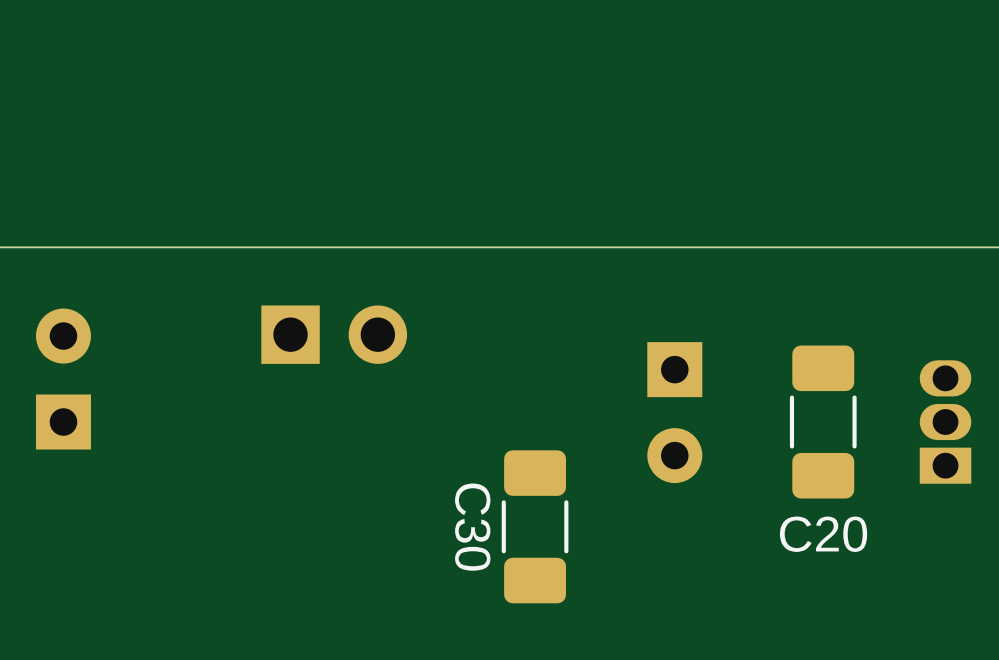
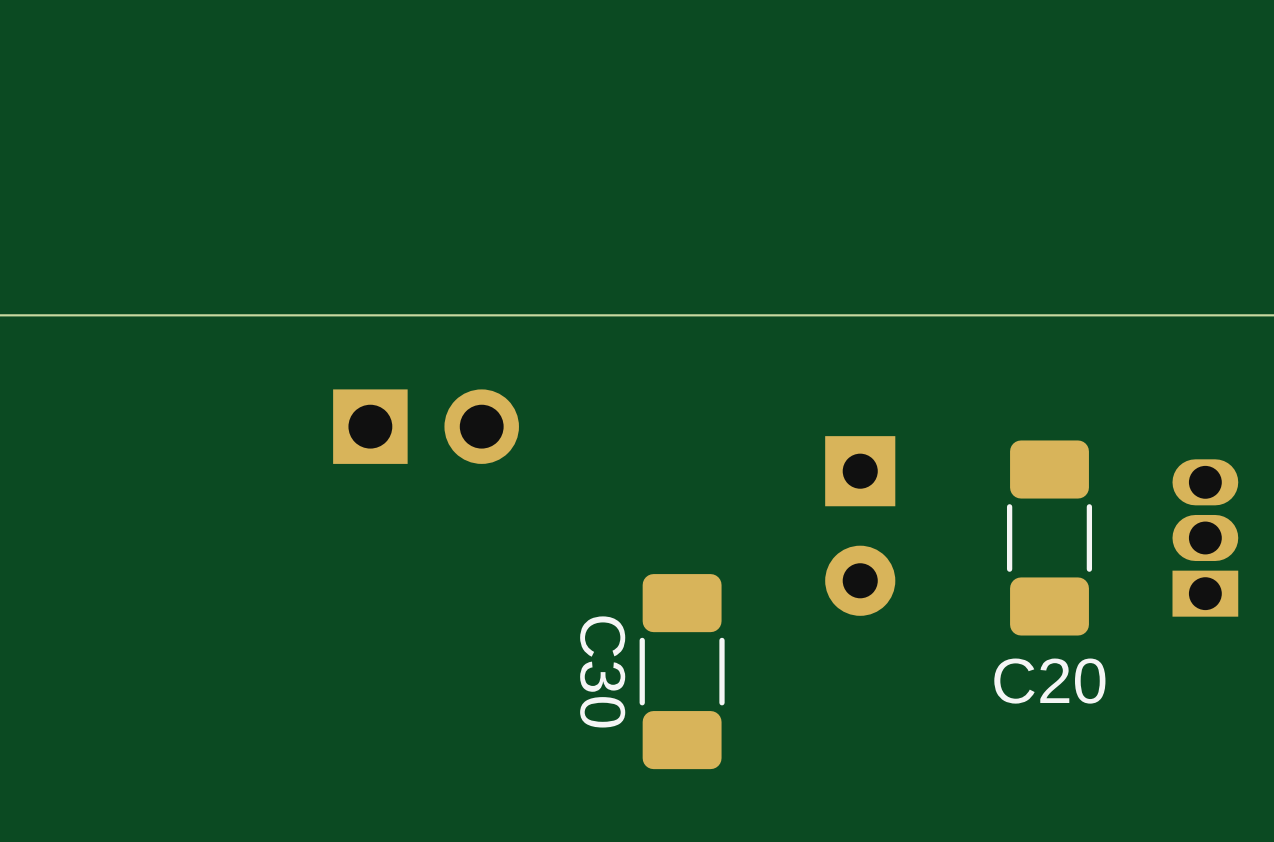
part: (63, 379) -> none

